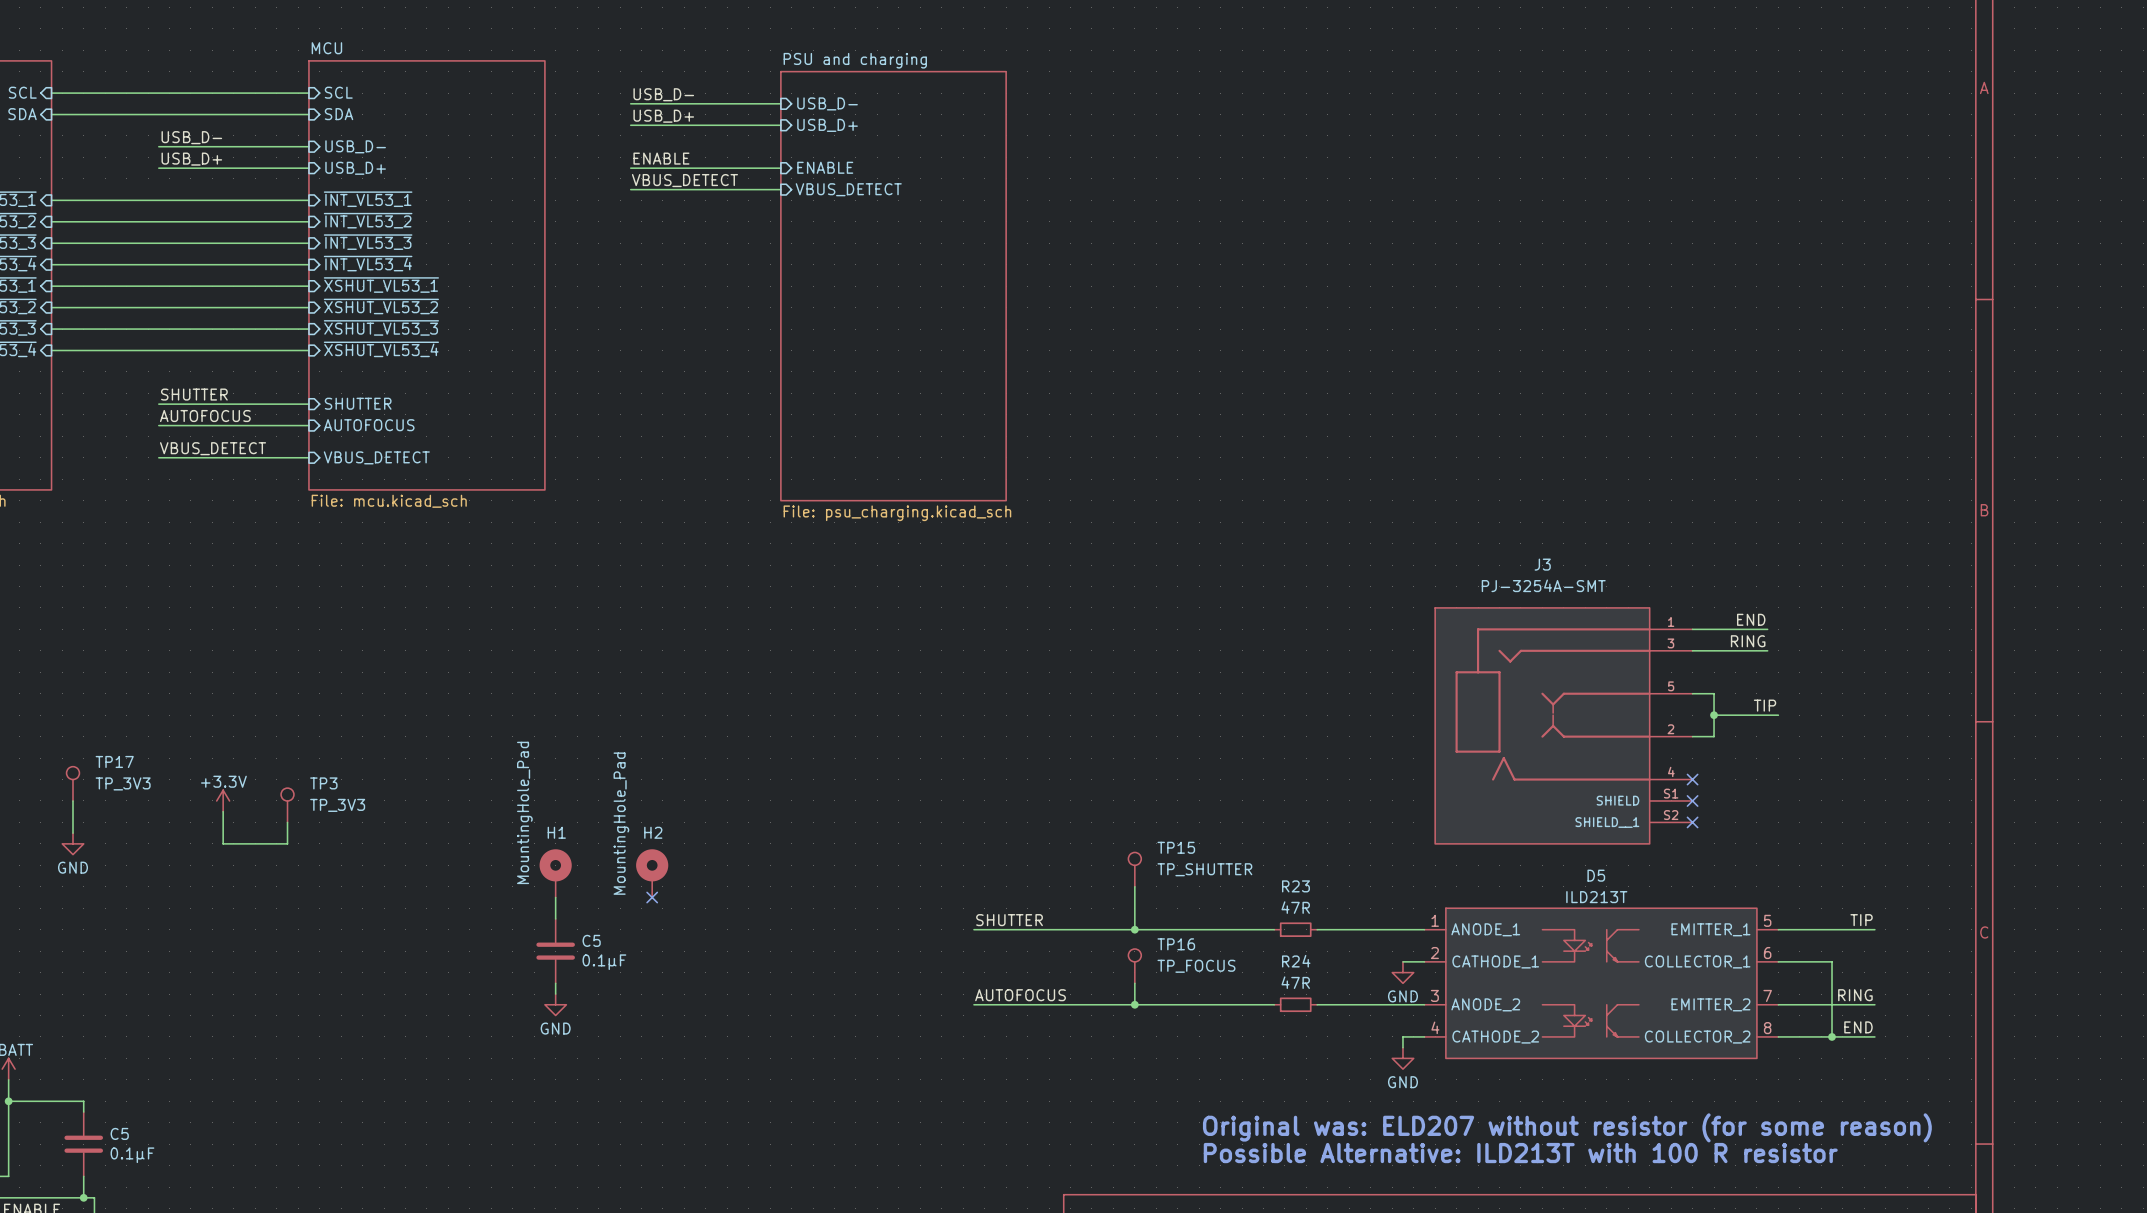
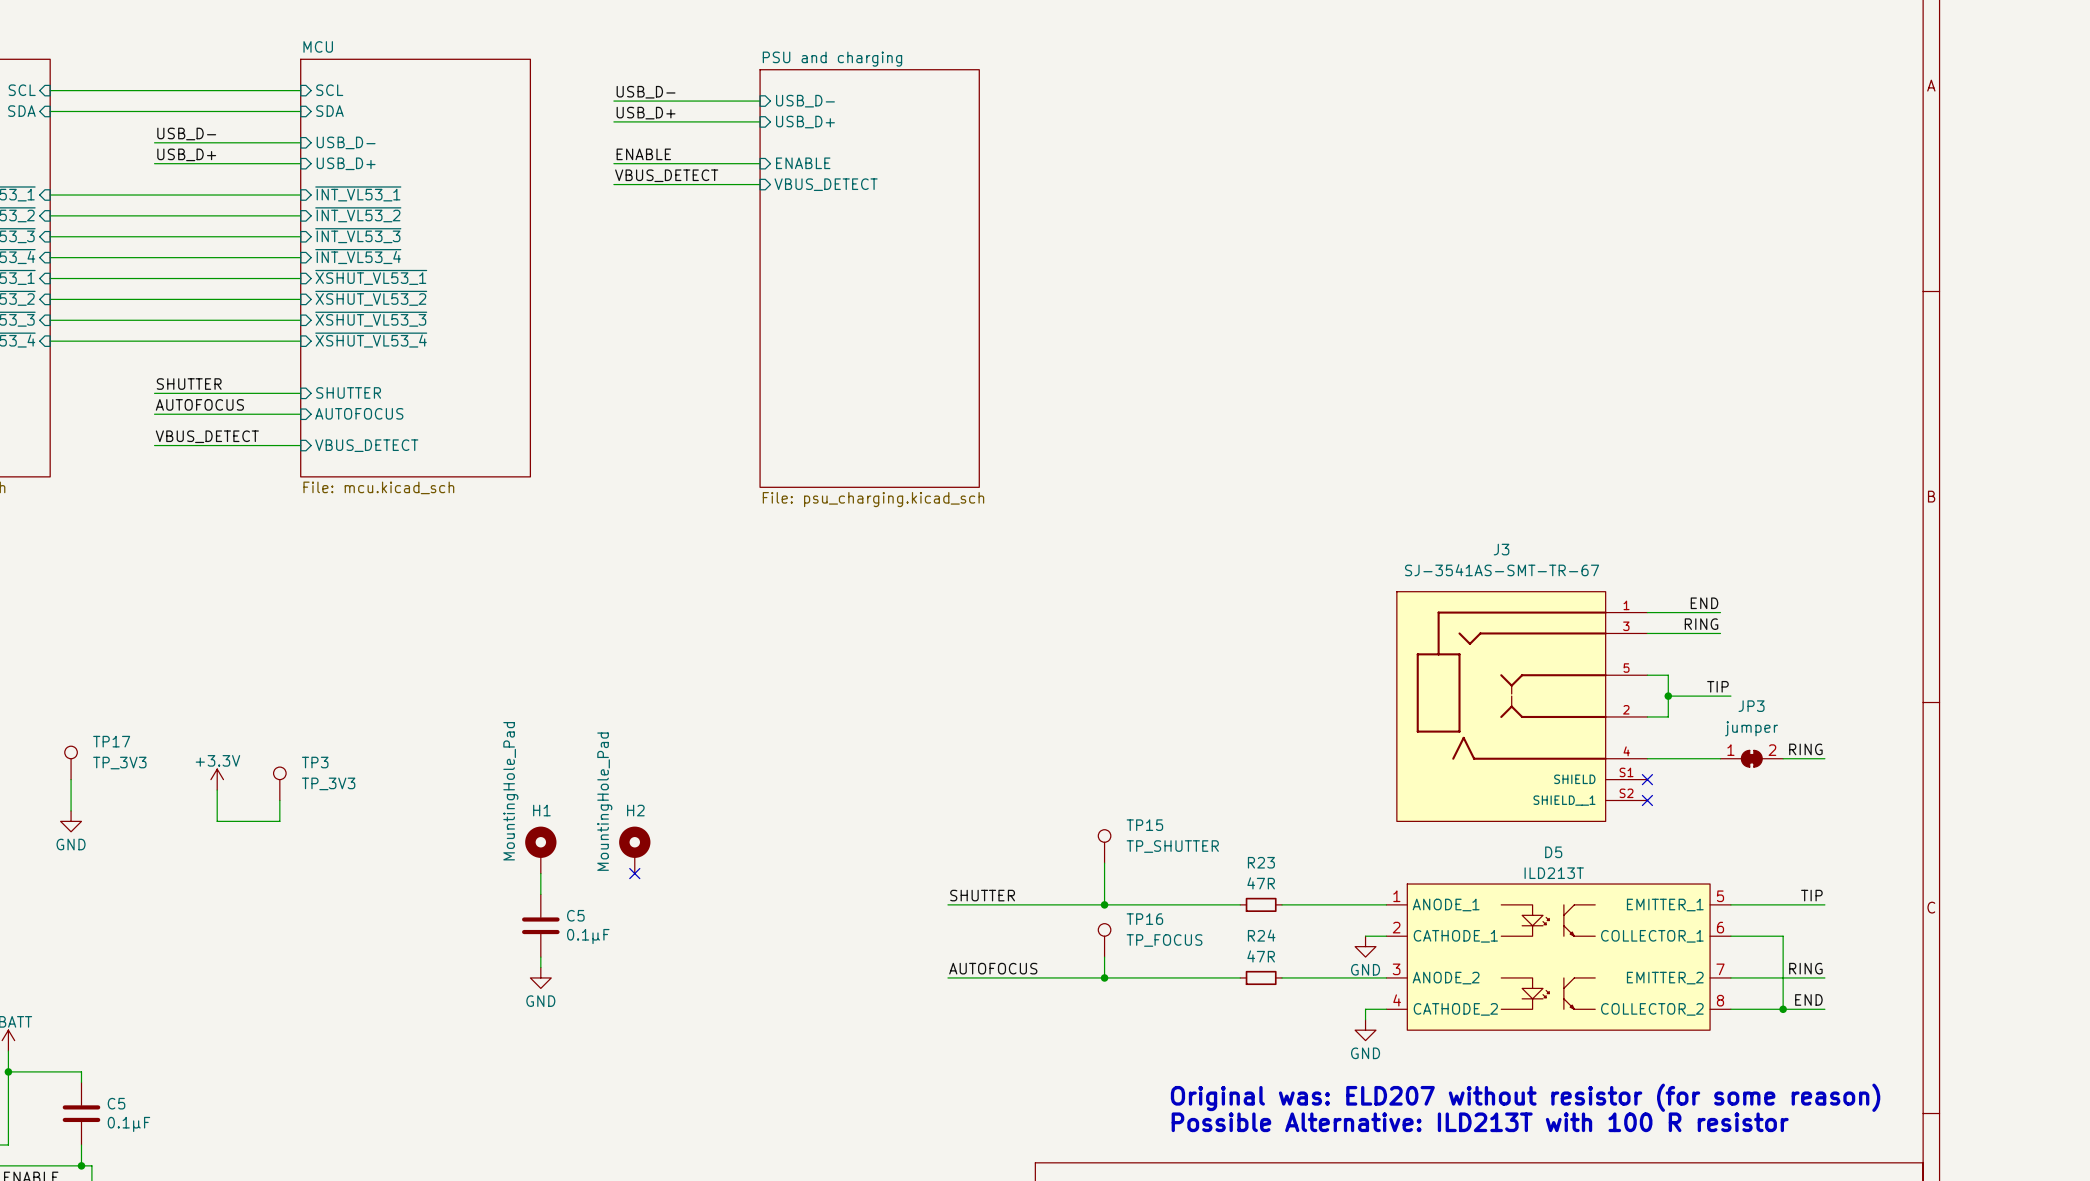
J3 value: PJ-3254A-SMT (1543, 585) -> SJ-3541AS-SMT-TR-67 (1502, 570)
label: none -> RING (1805, 749)
wire: none -> (1647, 758) (1720, 758)
no-connect mark: (1692, 779) -> none
JP3: none -> jumper (1751, 758)
wire: none -> (1783, 758) (1824, 758)

